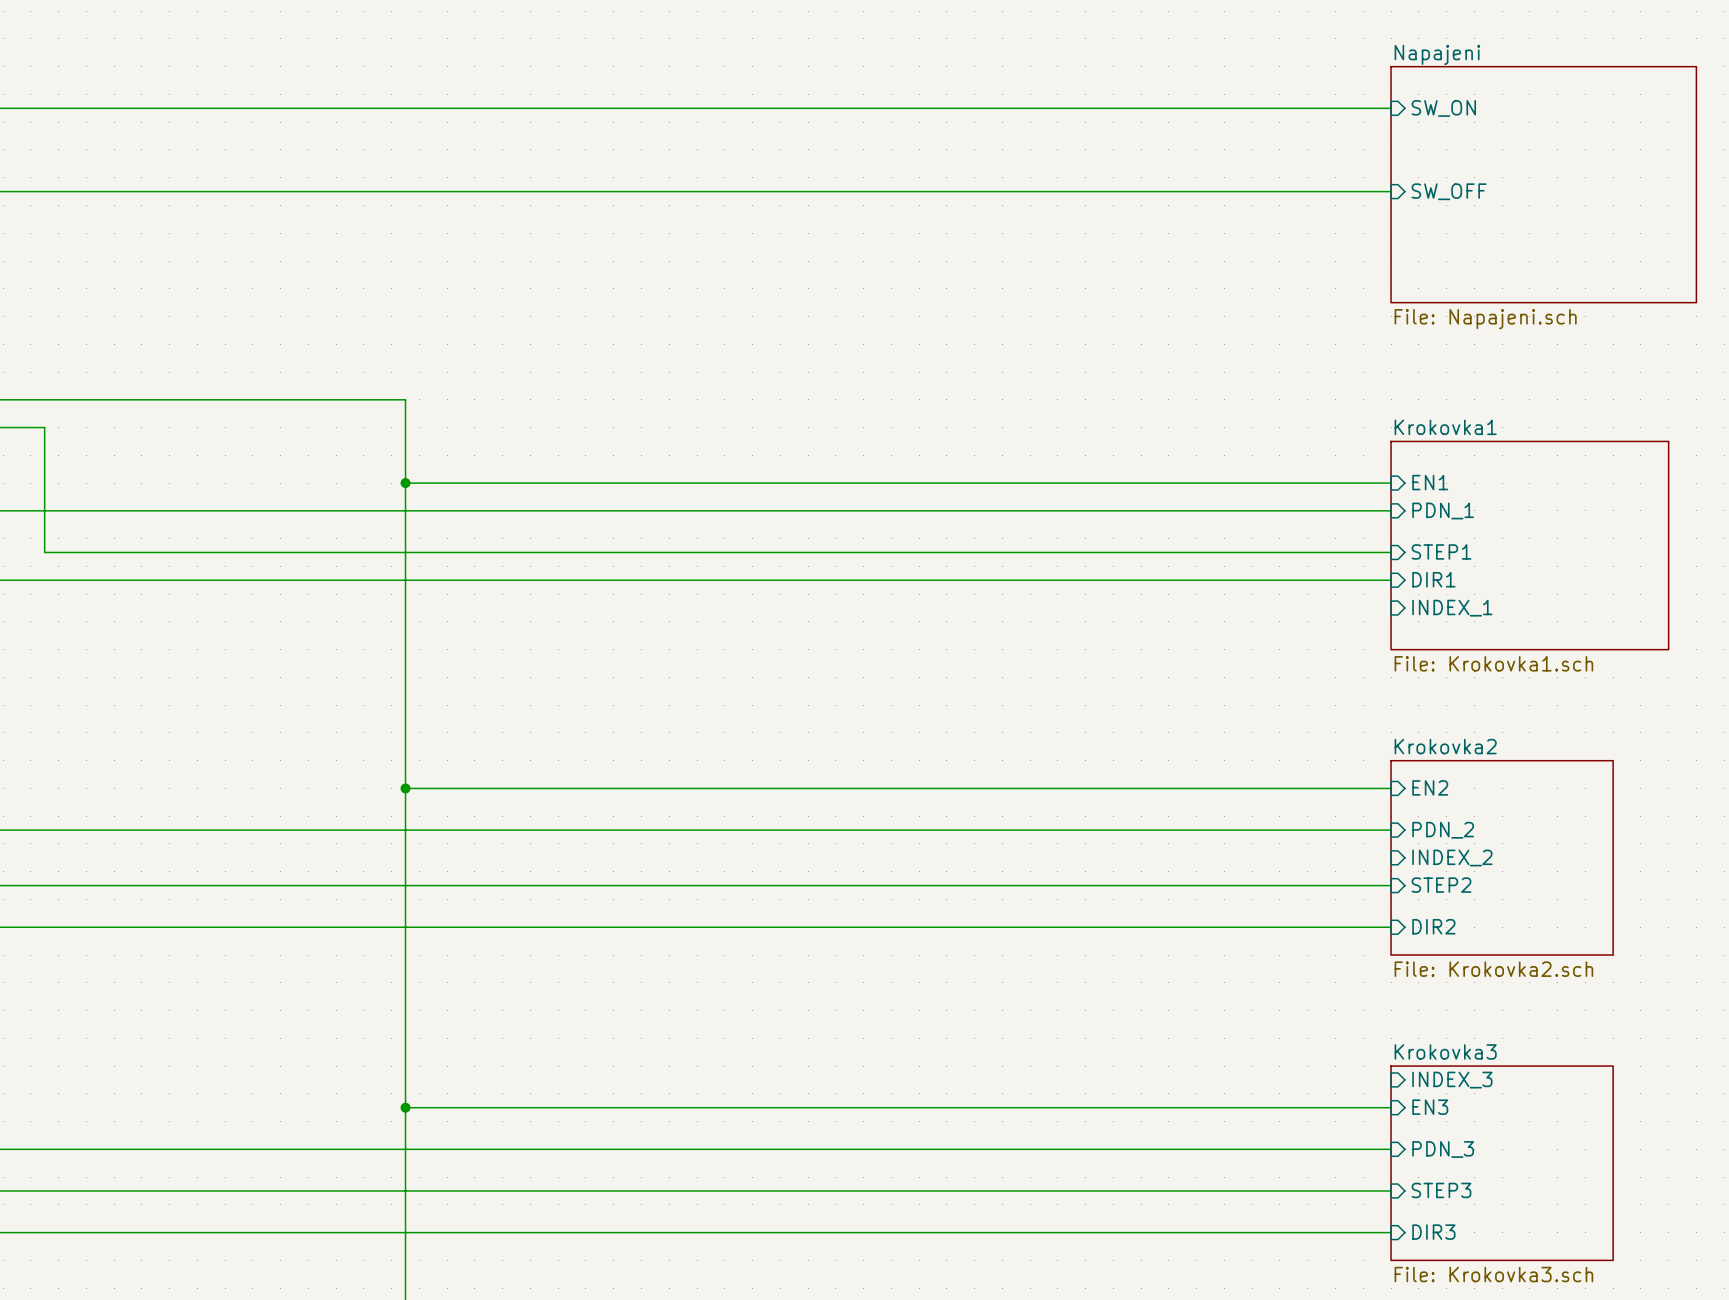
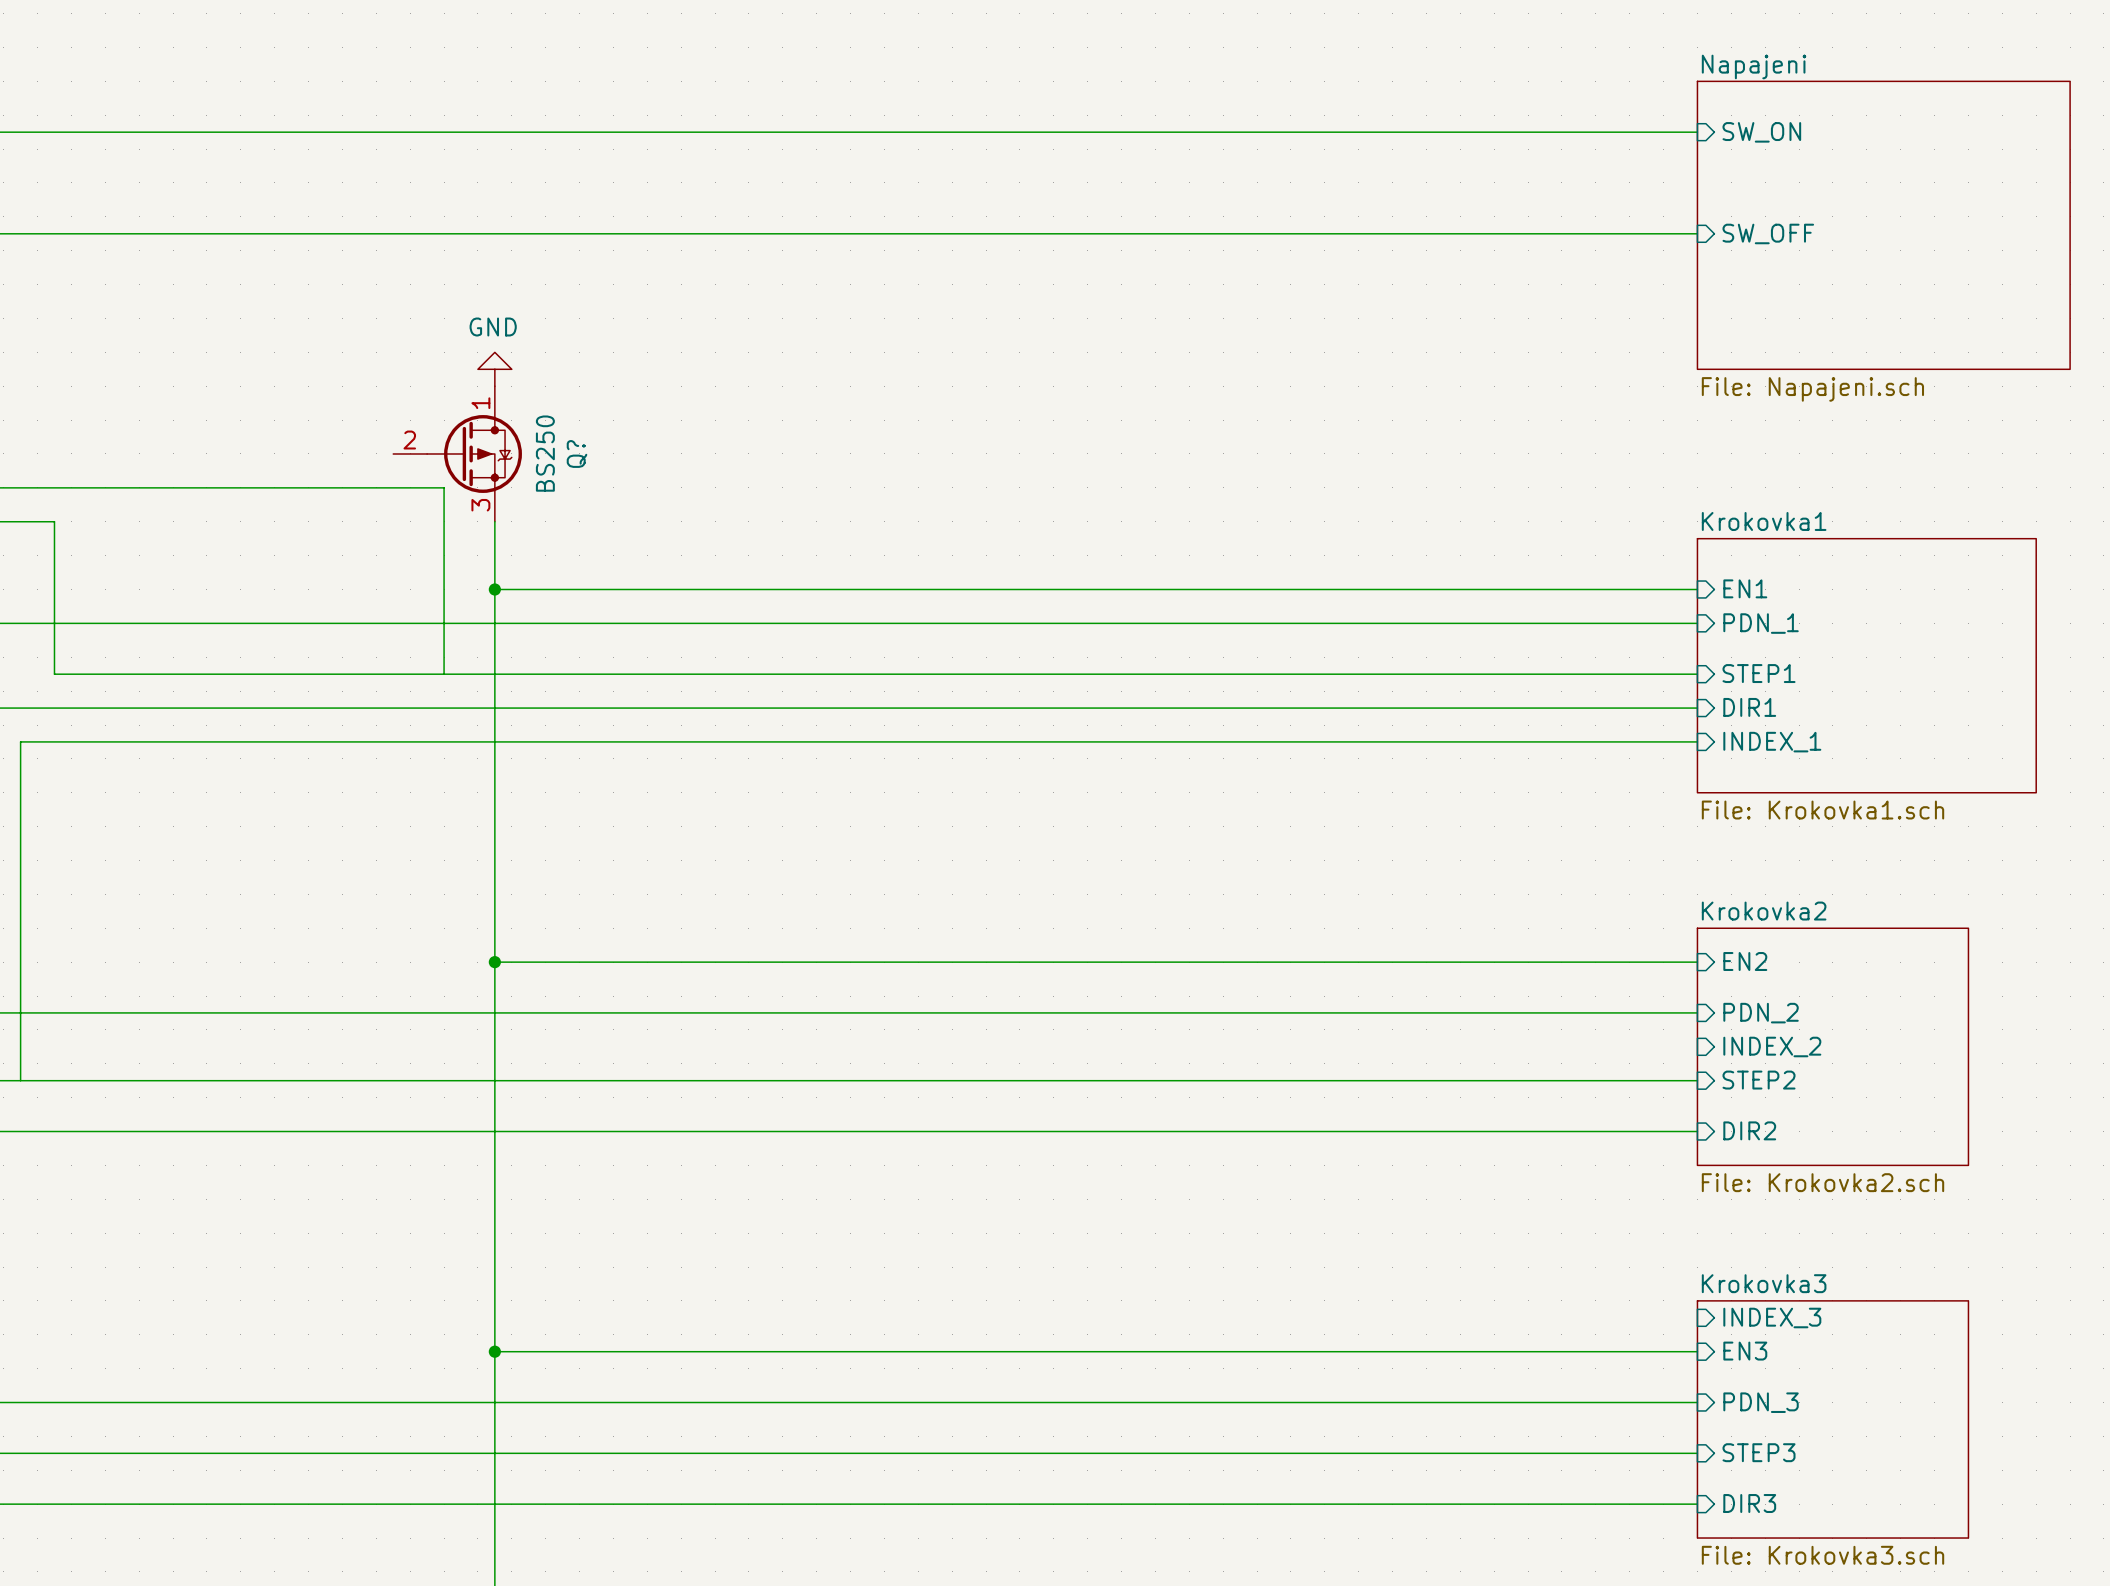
power symbol: none -> GND (494, 369)
Q?: none -> BS250 (457, 453)
wire: (363, 399) (405, 399) (405, 427) -> (444, 487) (444, 674)
wire: none -> (1697, 741) (20, 741) (20, 1080)

